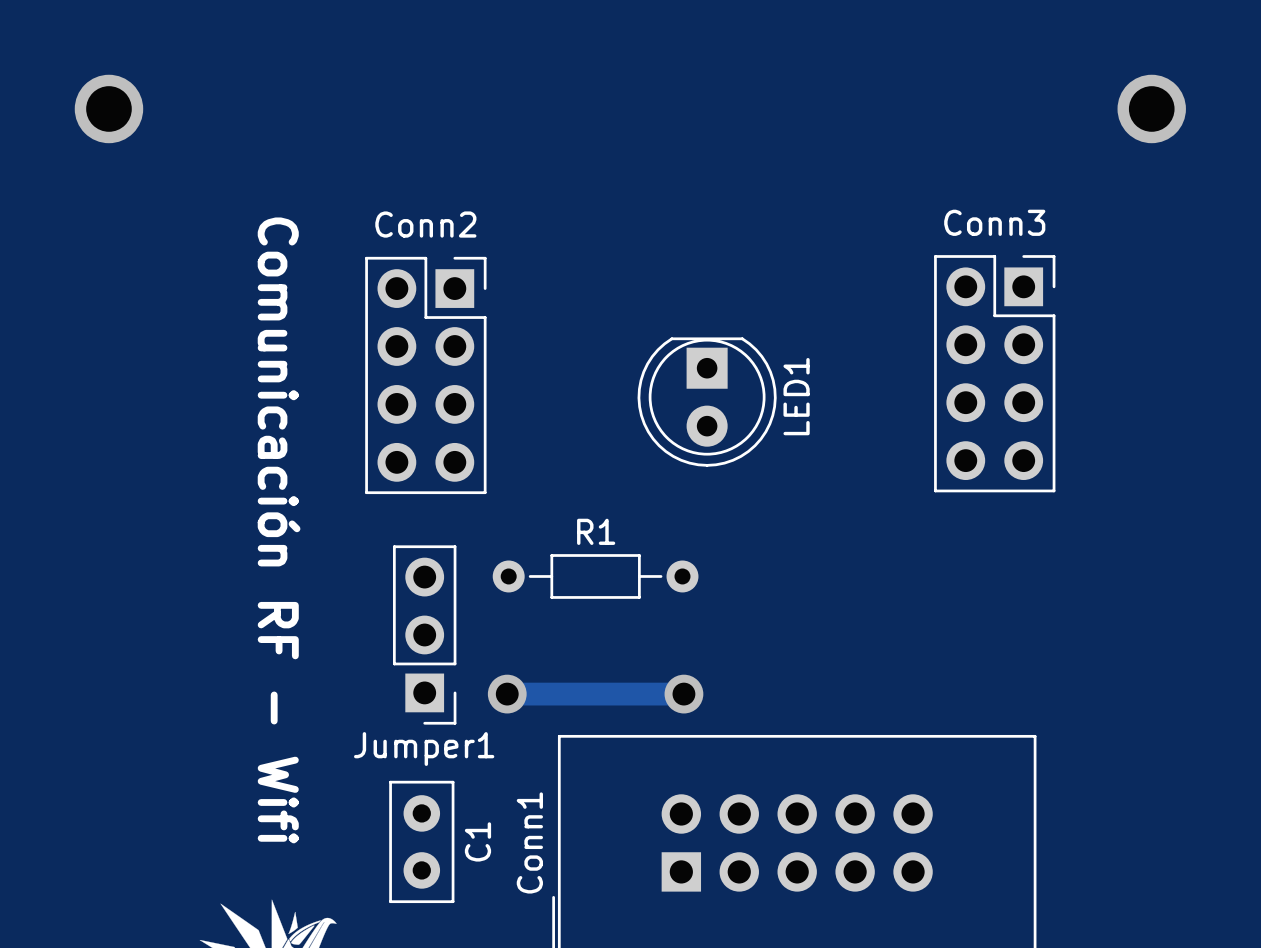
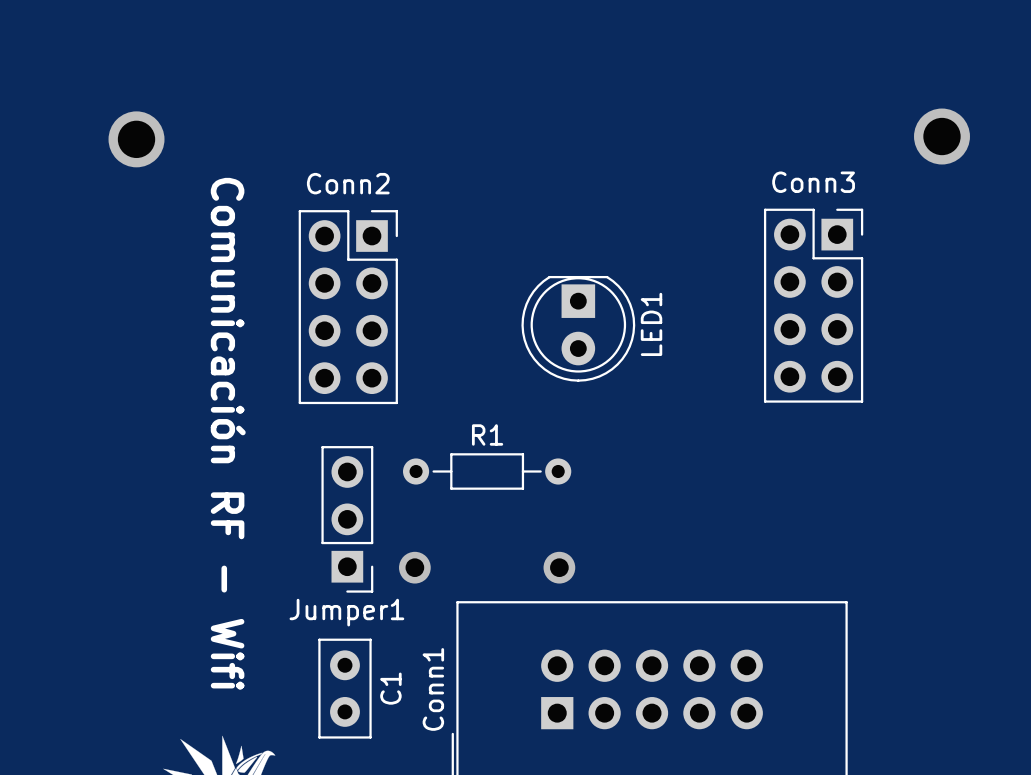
via position: (108, 108) -> (136, 139)
via position: (1151, 108) -> (941, 136)
track: (507, 694) (682, 694) -> none

